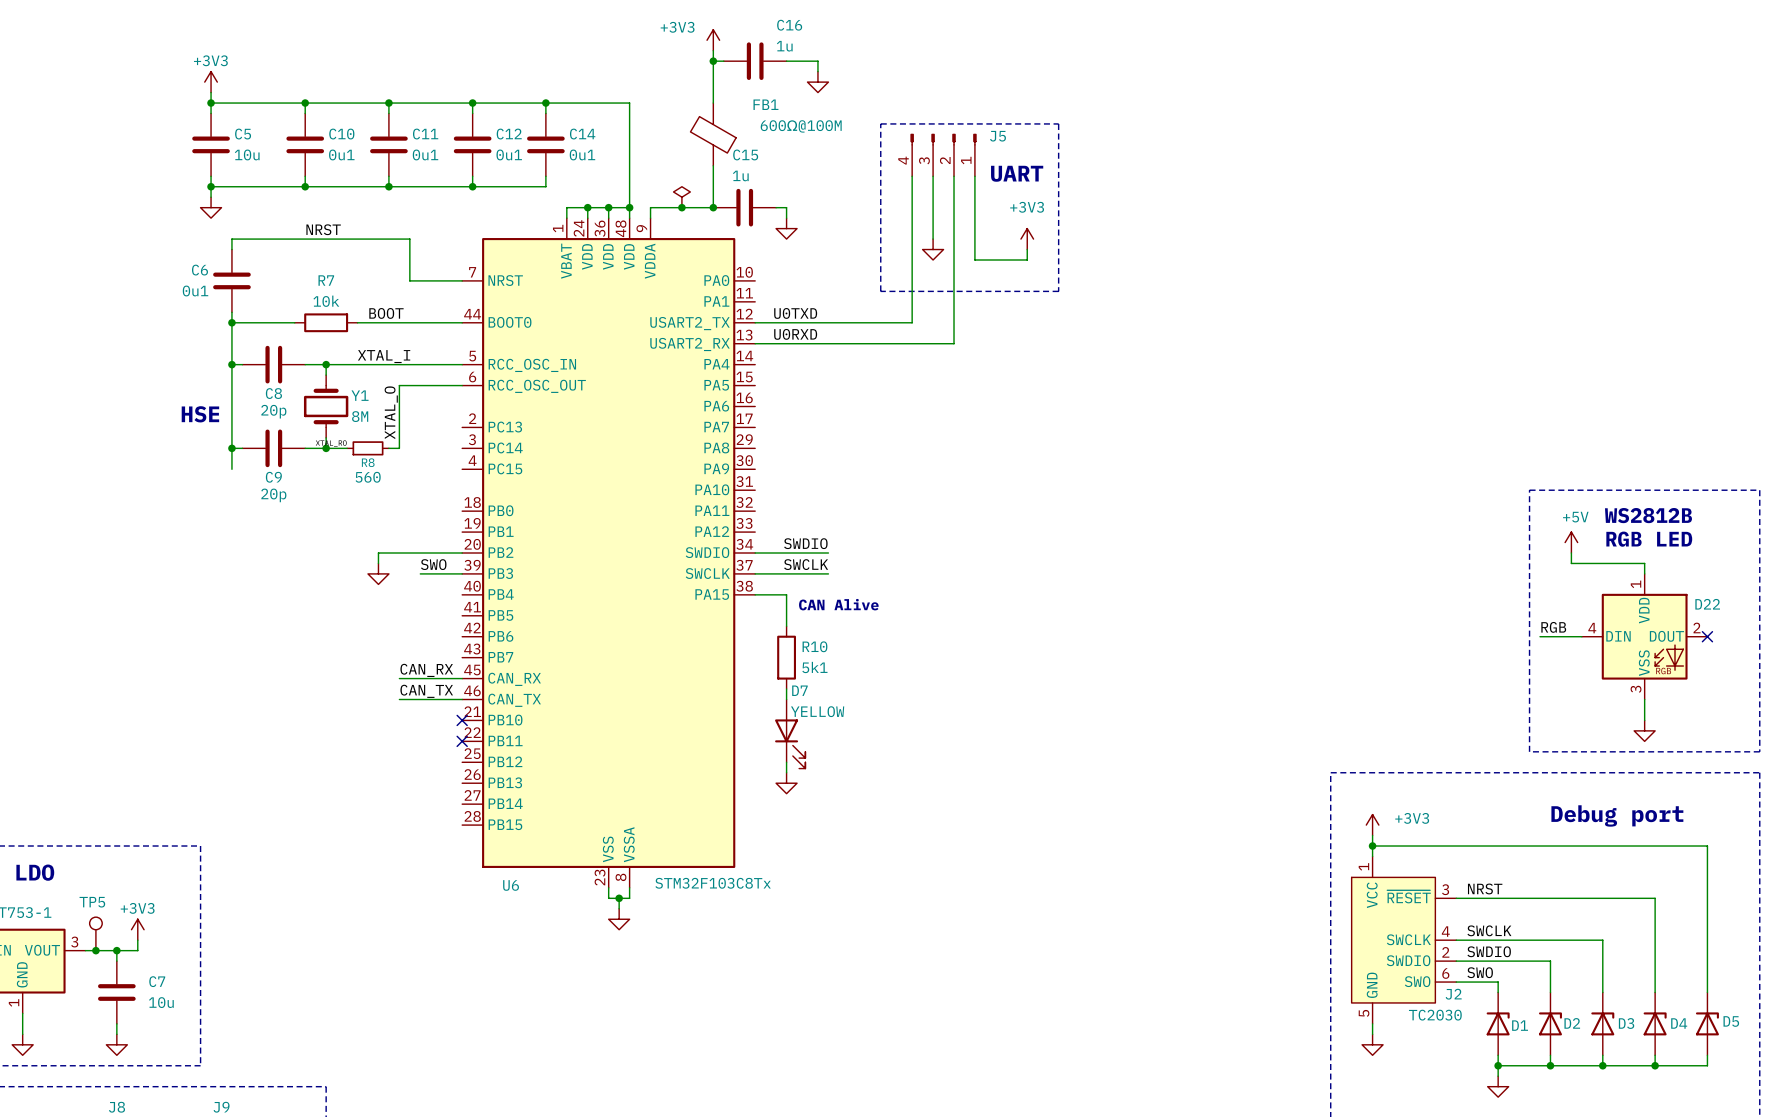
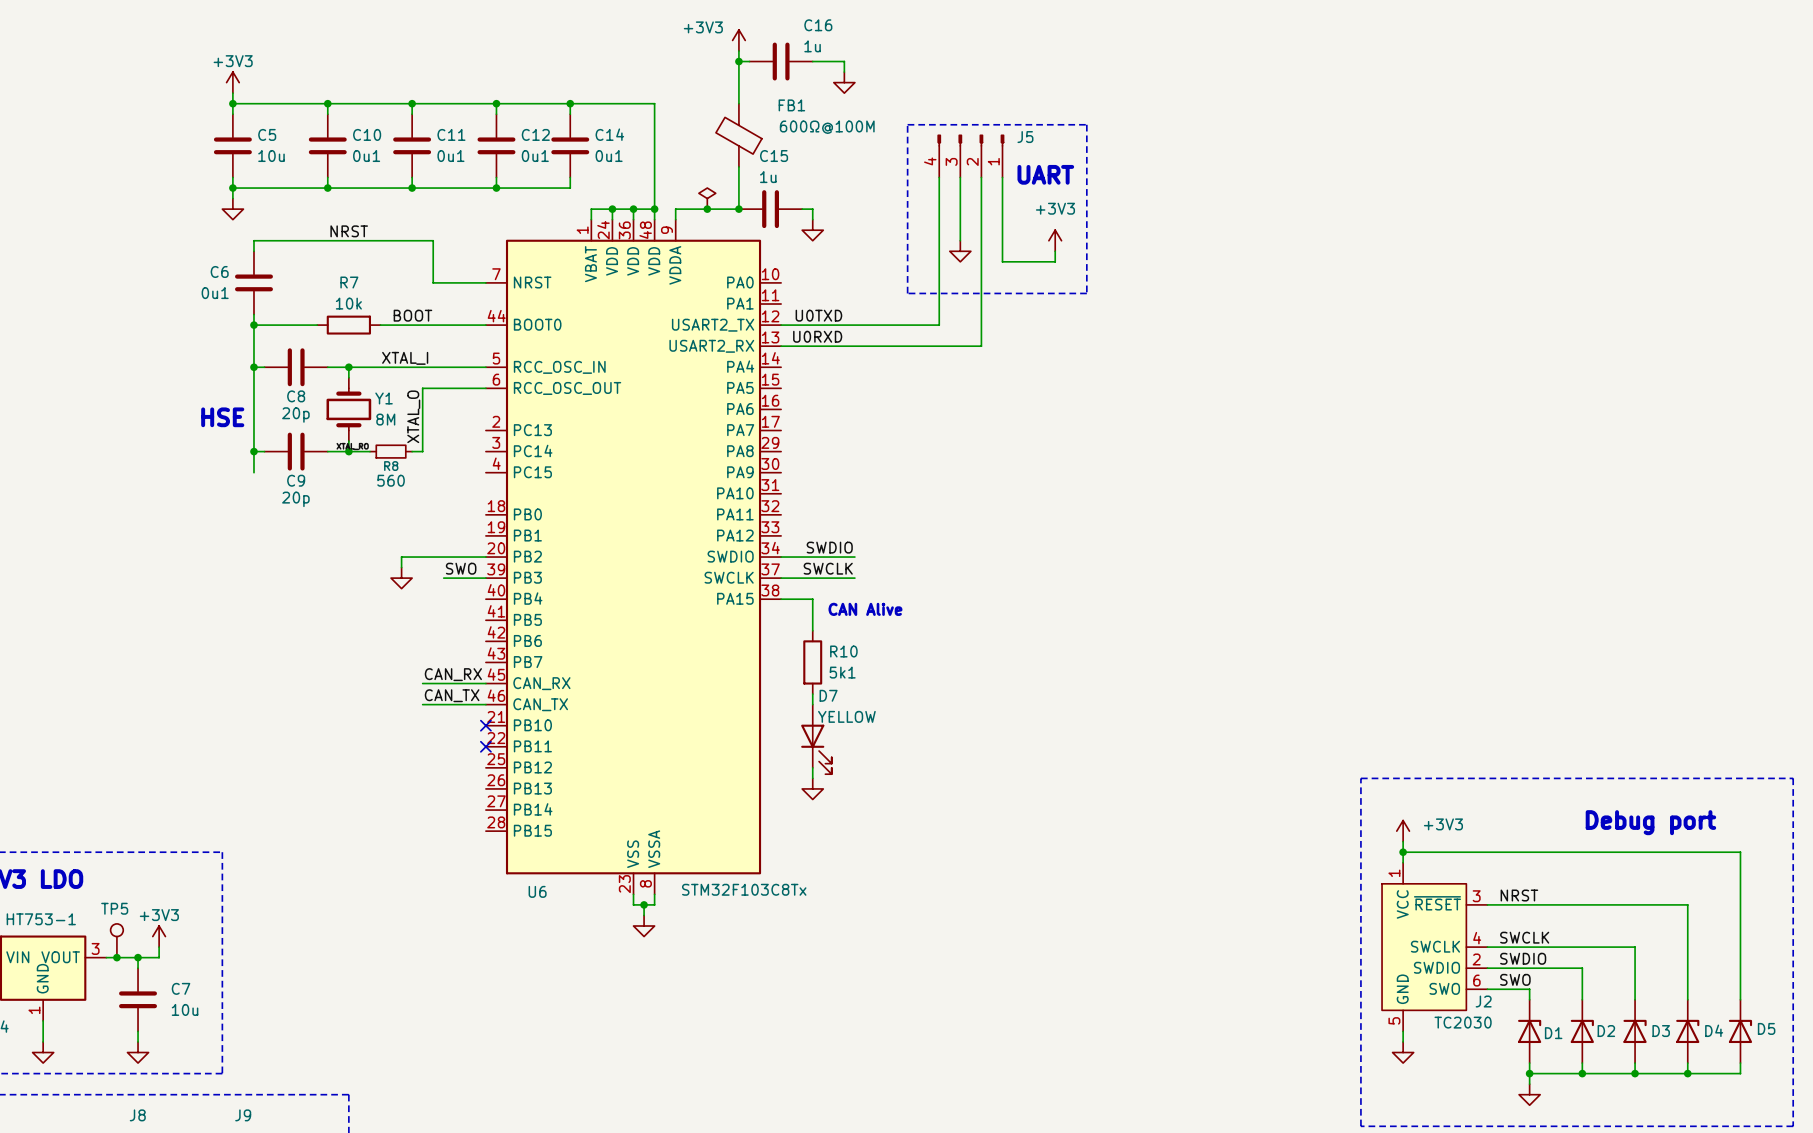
line: (1529, 490) (1759, 490) (1759, 751) (1529, 751) (1529, 490) -> none
text: WS2812B (1648, 515) -> none
text: RGB LED (1649, 539) -> none
power symbol: +5V (1571, 542) -> none
wire: (1571, 553) (1571, 563) (1644, 563) (1644, 573) -> none
label: RGB (1553, 627) -> none
wire: (1540, 636) (1581, 636) -> none
D22: (1644, 636) -> none
no-connect mark: (1707, 636) -> none
wire: (1644, 699) (1644, 720) -> none
power symbol: (1644, 730) -> none

